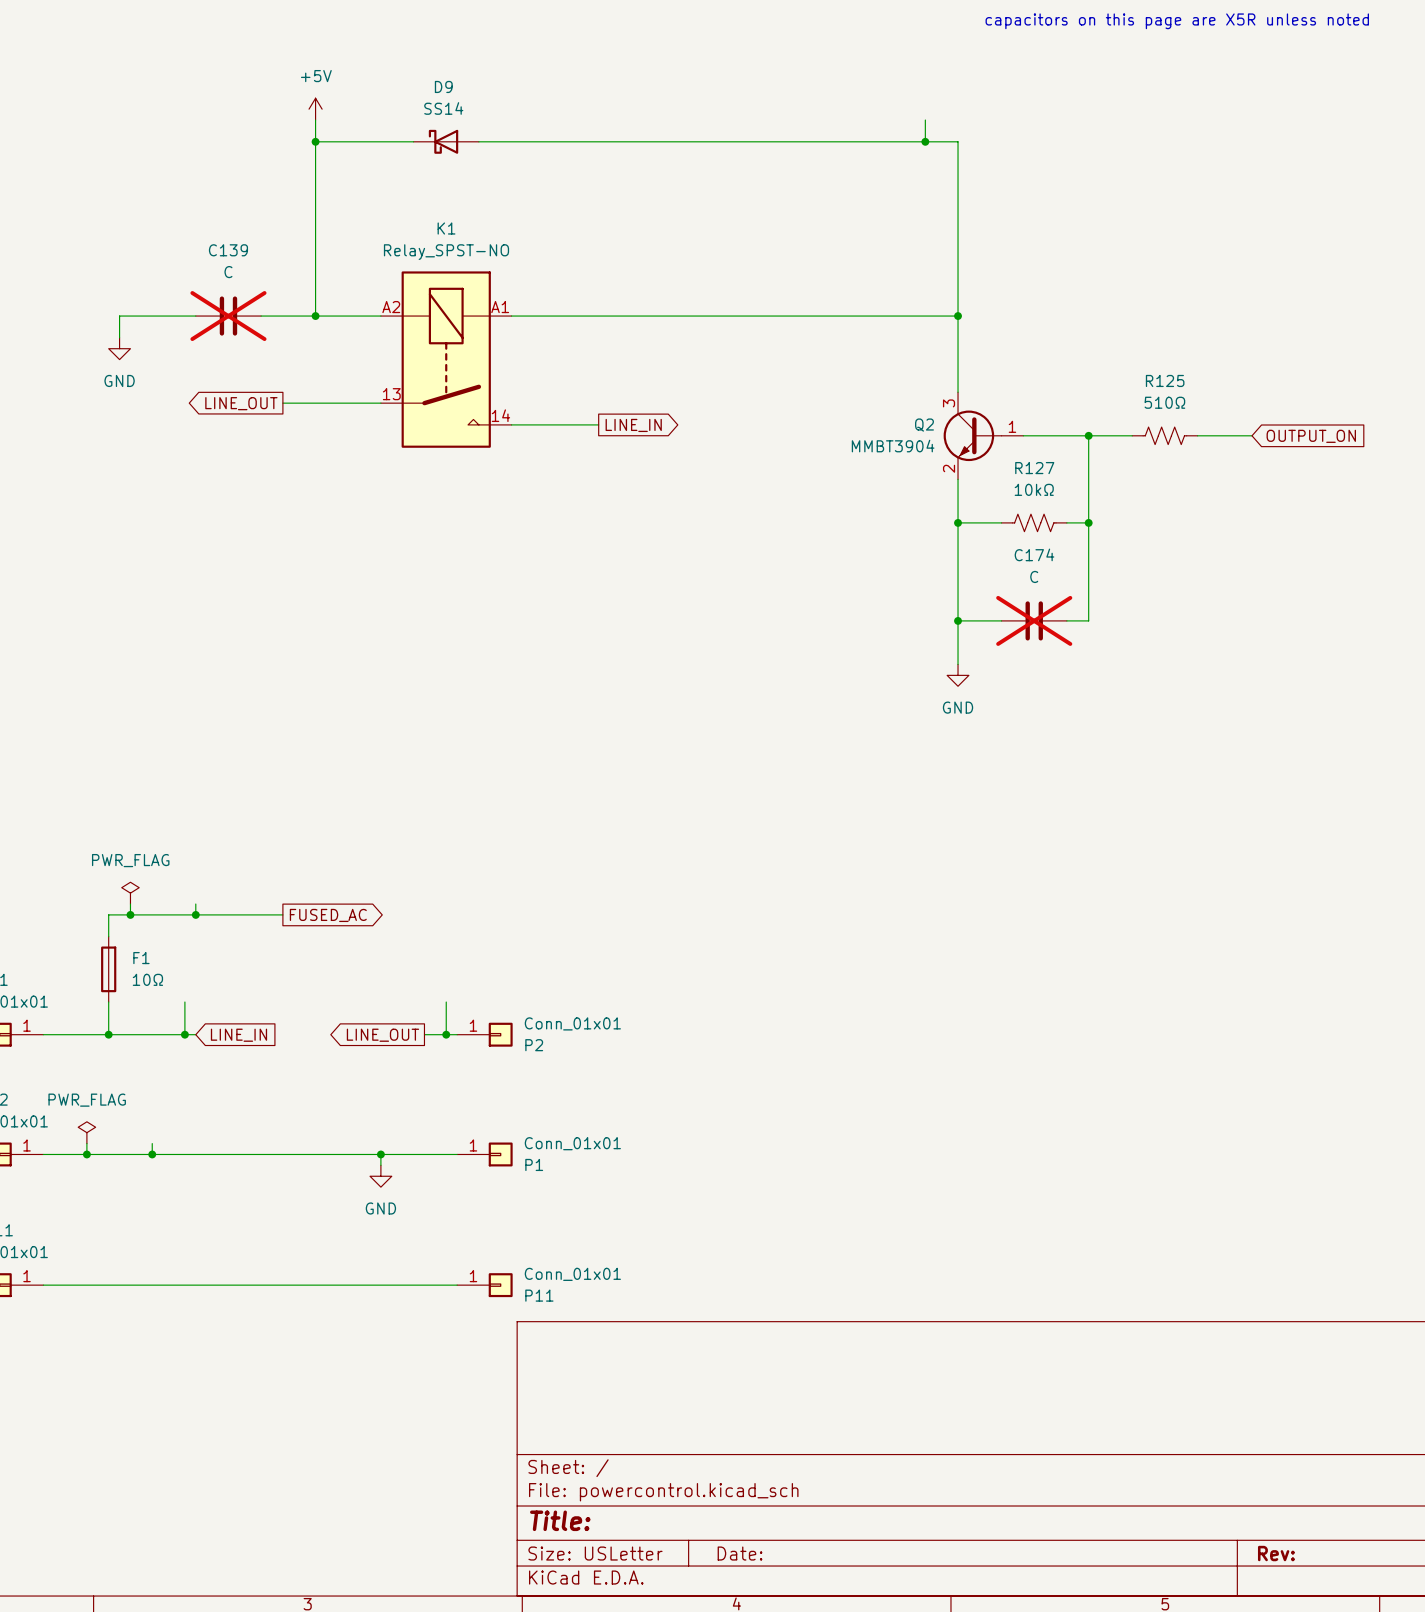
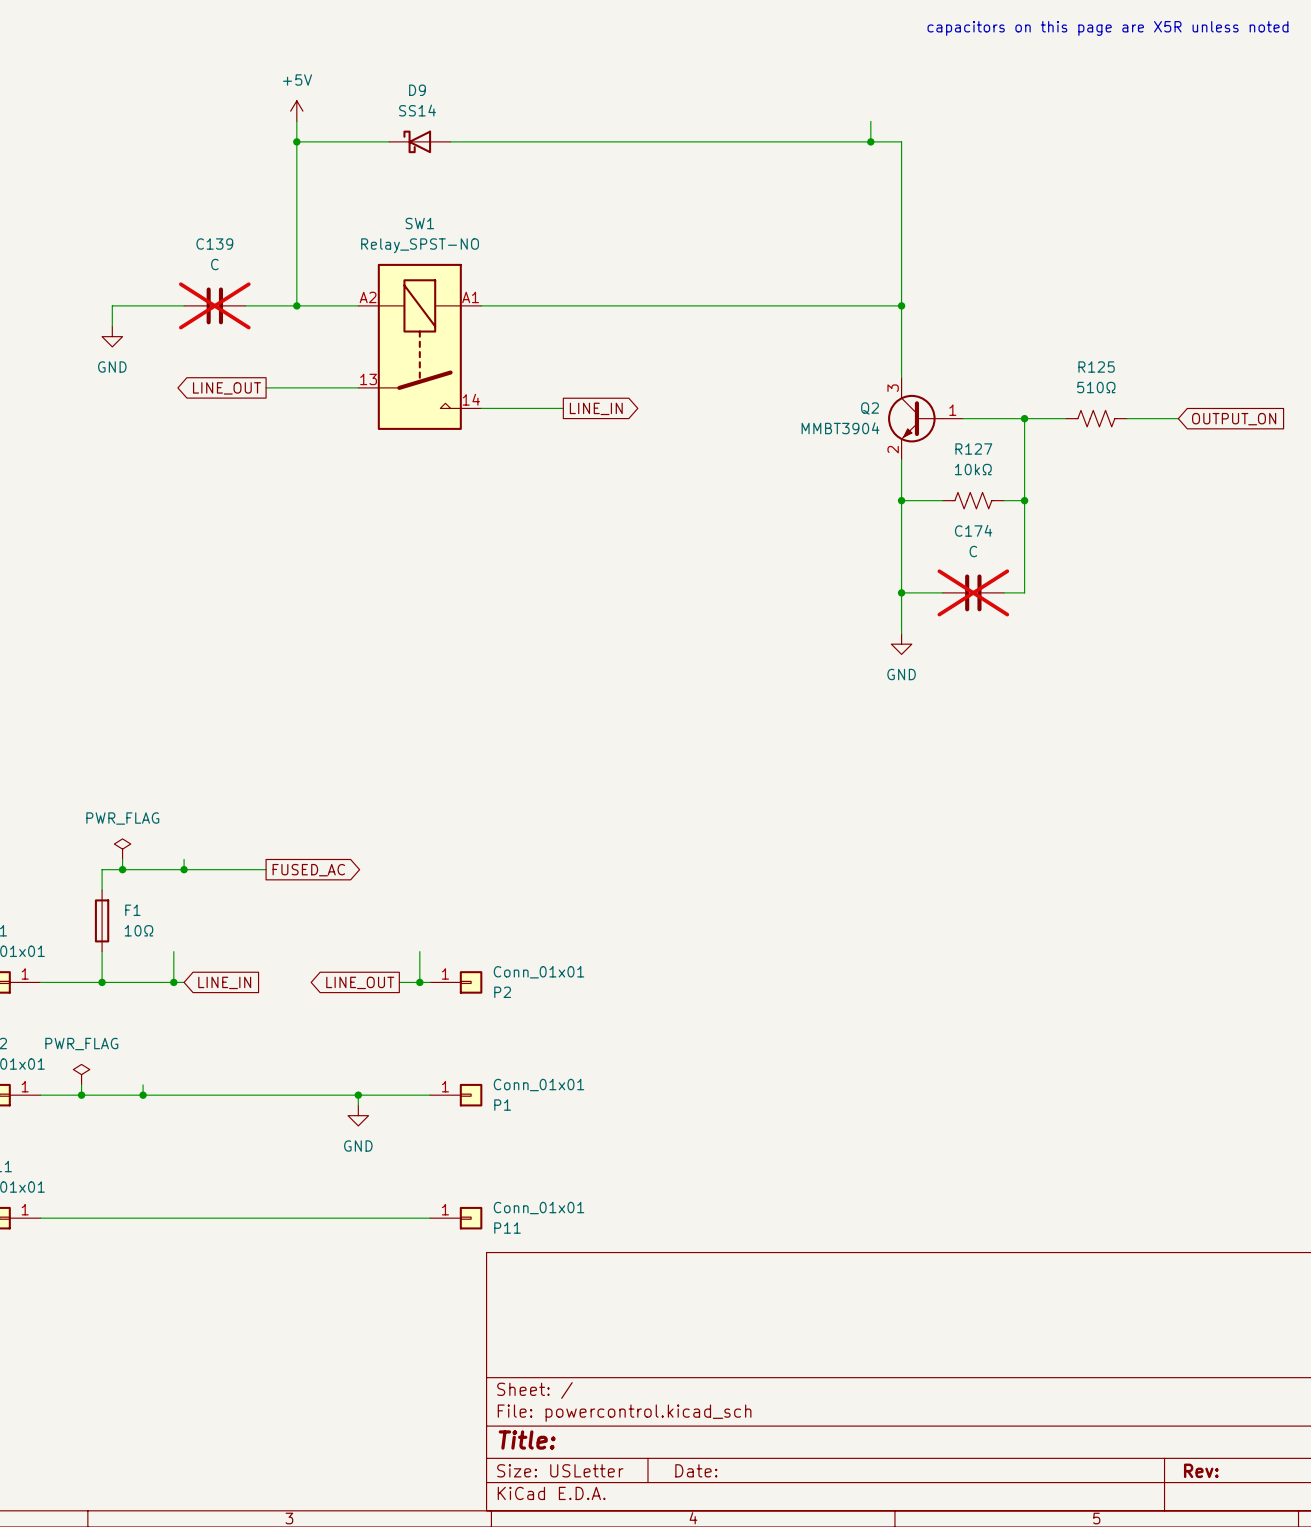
K1 name: K1 (446, 228) -> SW1 (419, 223)

